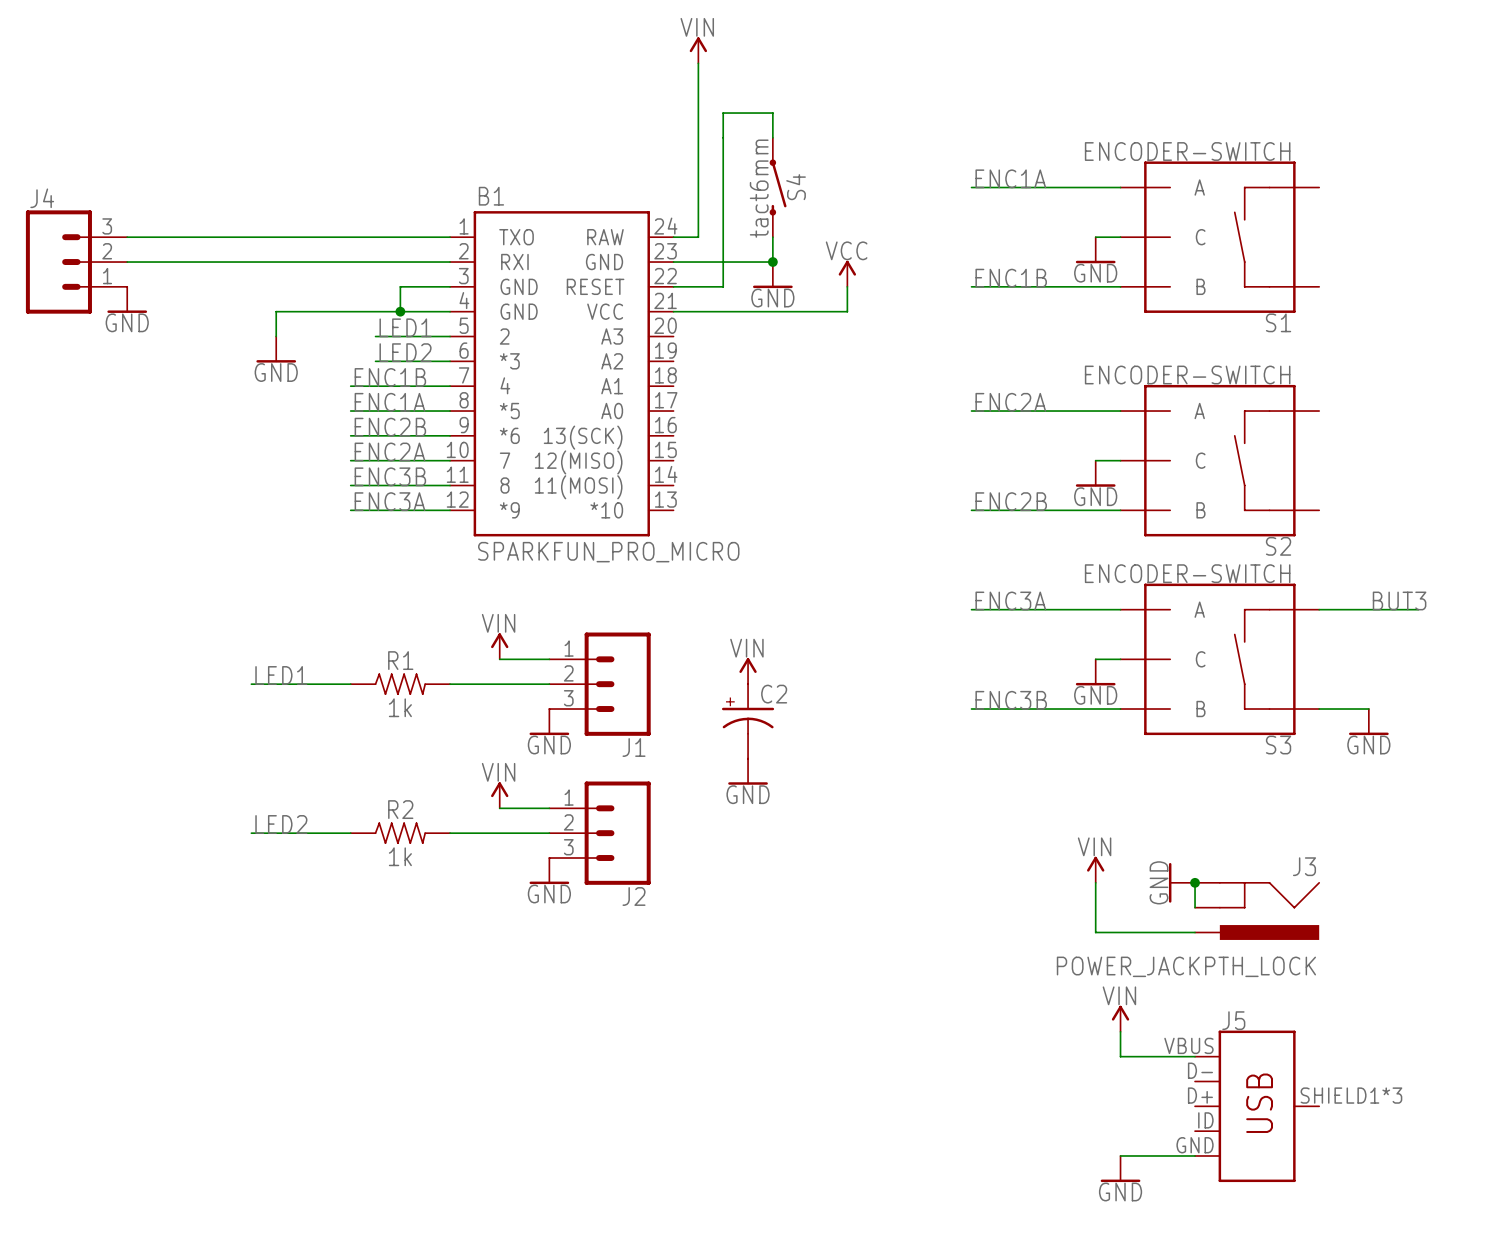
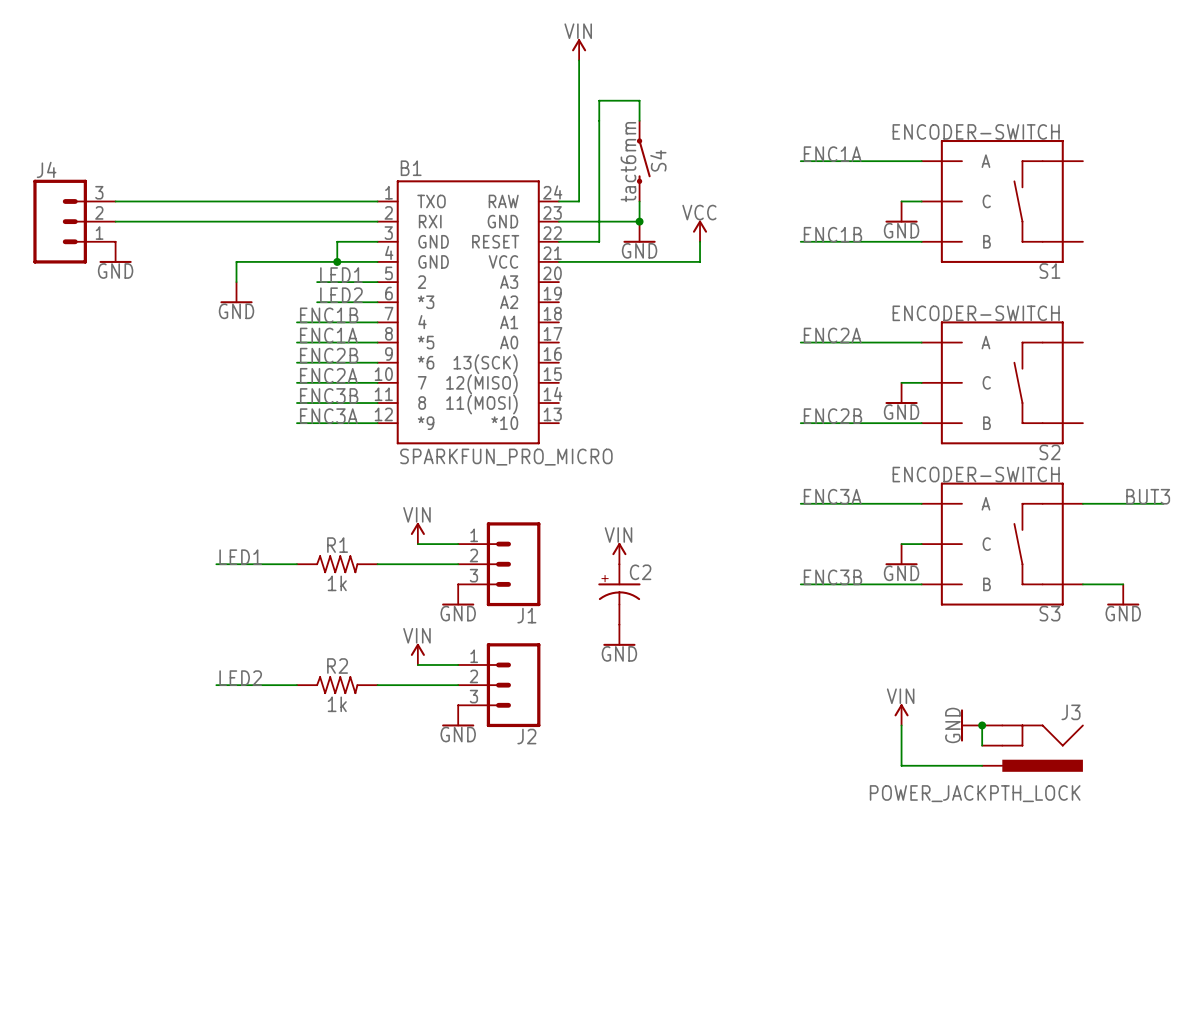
power symbol: VIN (1120, 1018) -> none
wire: (1120, 1031) (1120, 1056) (1195, 1056) -> none
J5: (1257, 1106) -> none
wire: (1120, 1155) (1195, 1155) -> none
power symbol: GND (1120, 1169) -> none

